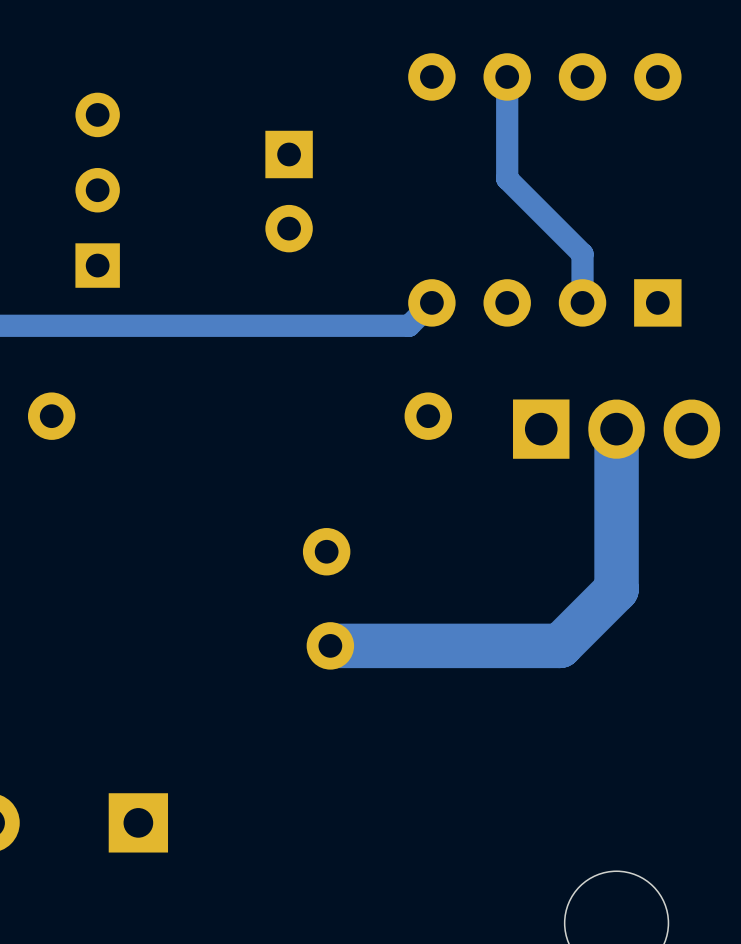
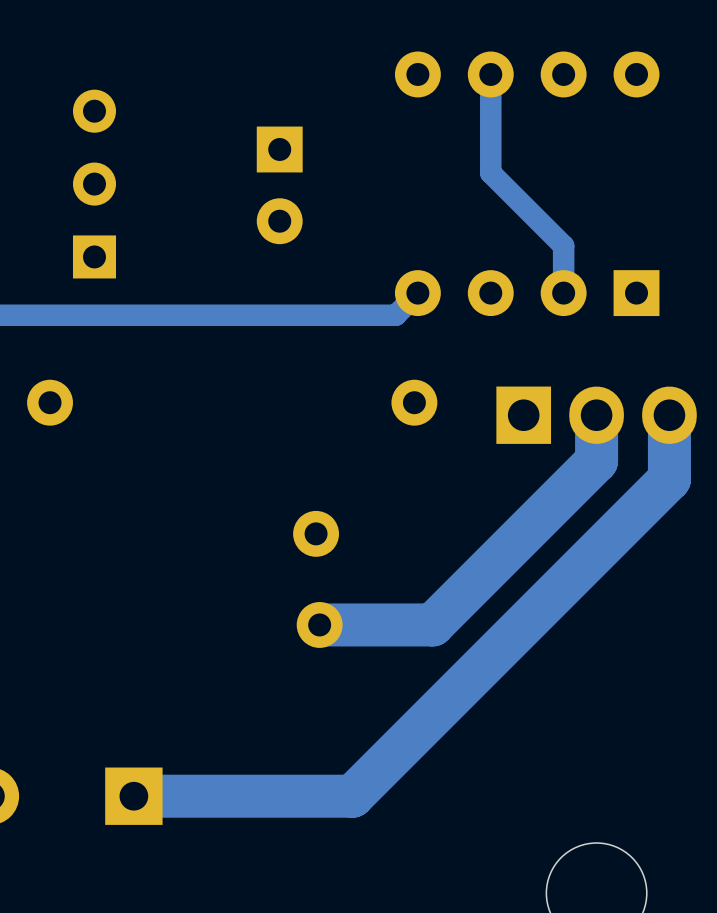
track: none -> (669, 415) (669, 479) (352, 796) (133, 796)
track: (616, 476) (616, 589) (560, 645) (447, 645) -> (596, 460) (432, 624)

